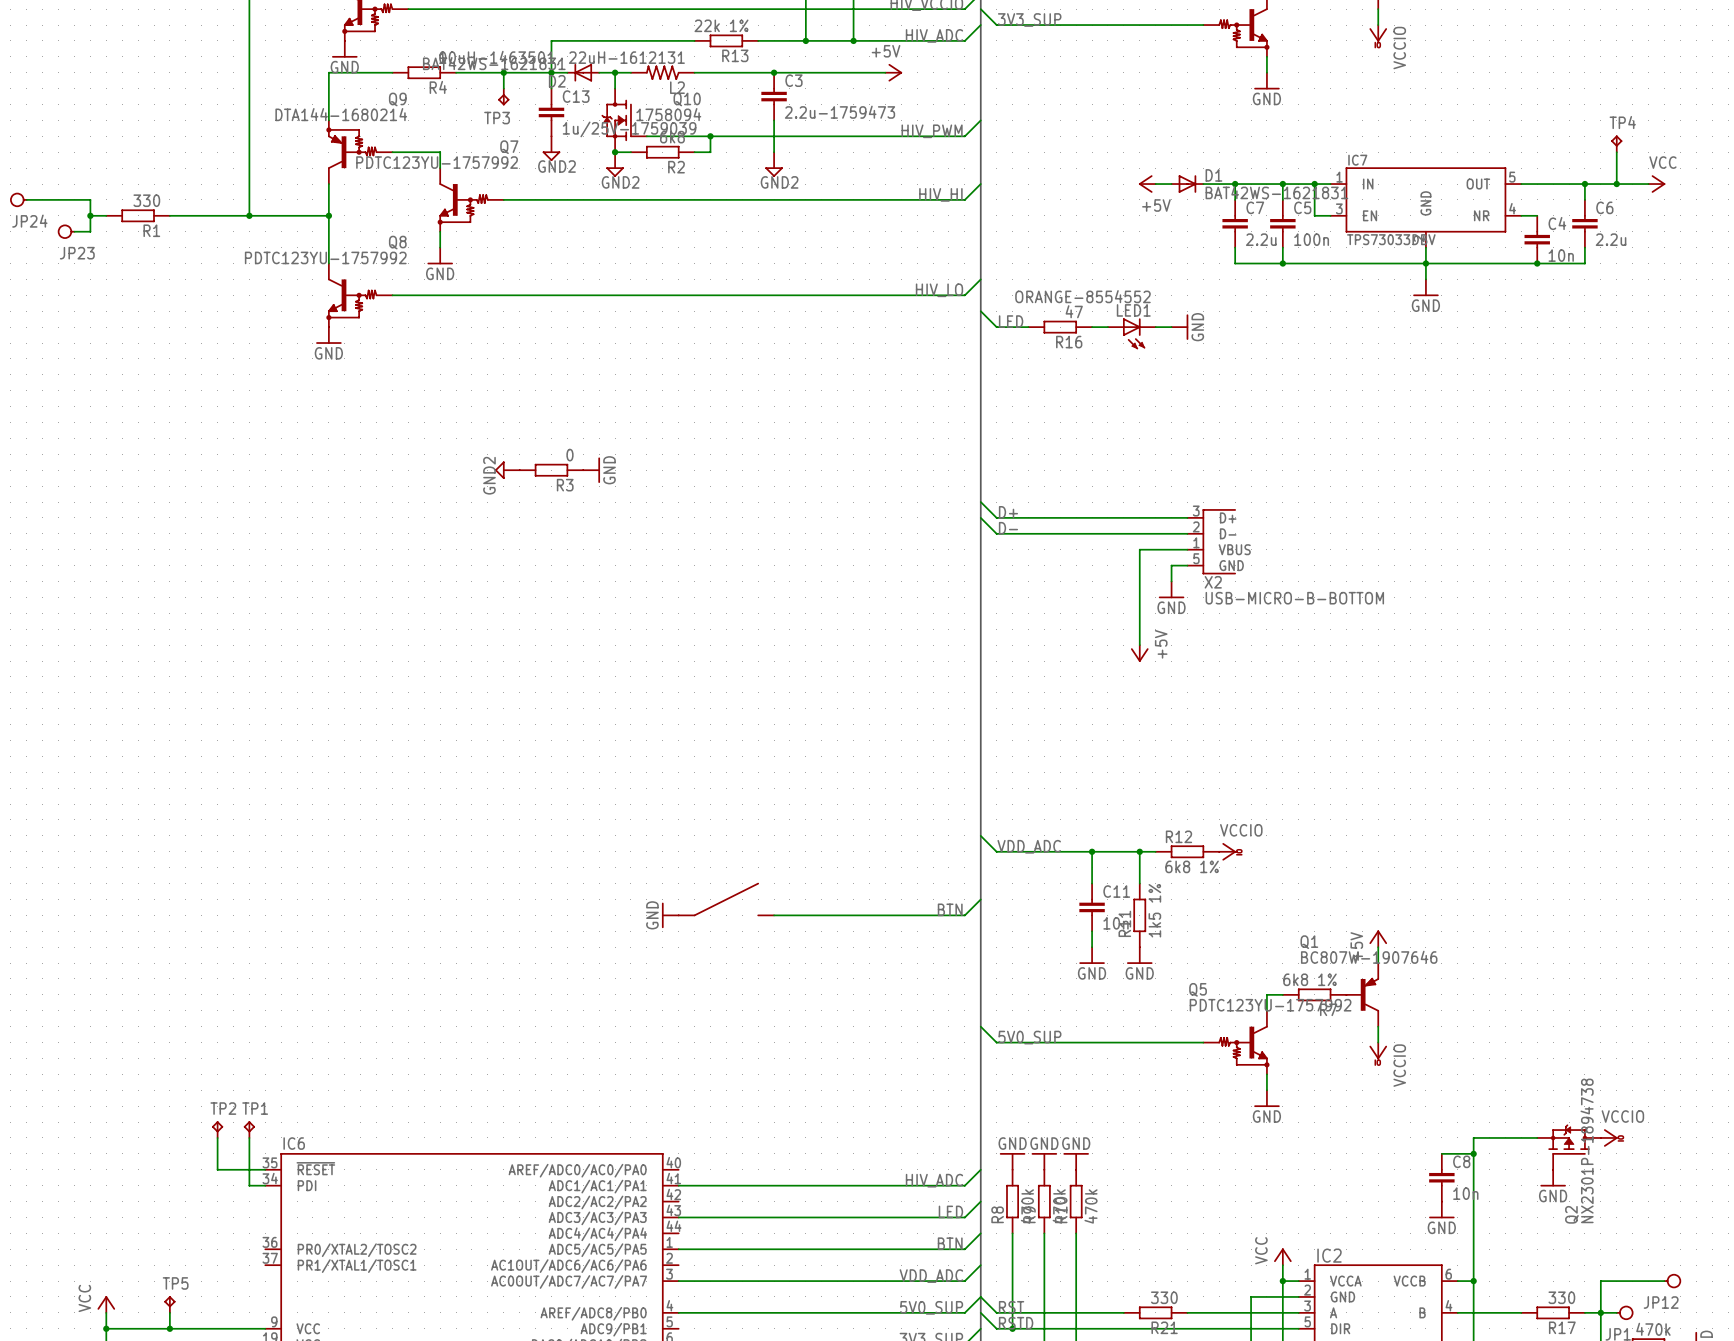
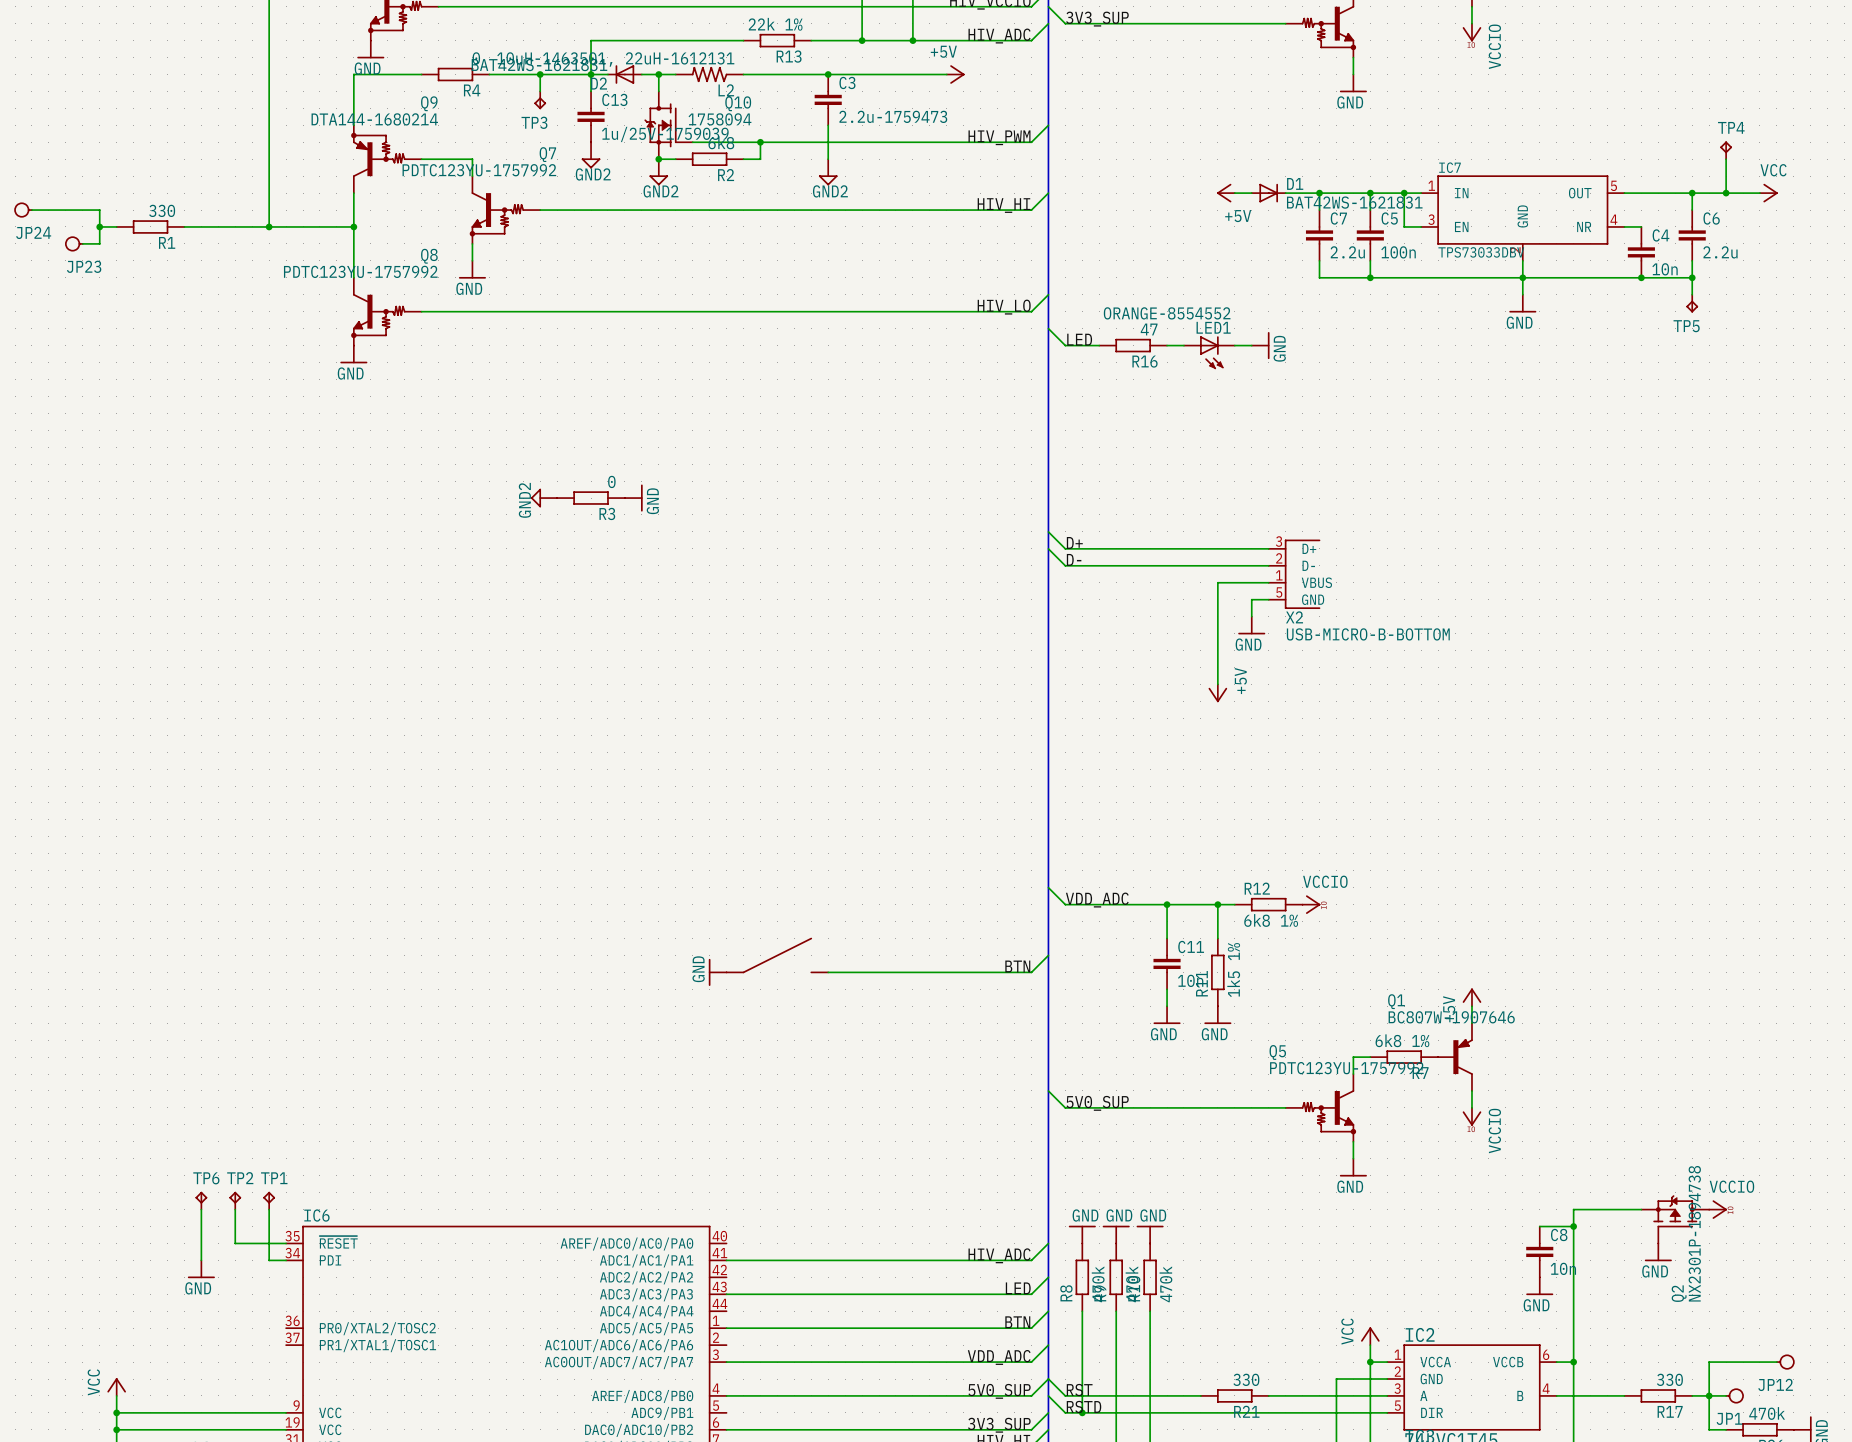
wire: none -> (1692, 277) (1692, 294)
junction: none -> (1692, 277)
TP6: none -> (201, 1200)
wire: none -> (201, 1209) (201, 1260)
power symbol: none -> GND (201, 1269)
TP5 rotation: 0° (169, 1301) -> 180° (1692, 306)
TP5 position: (169, 1304) -> (1692, 303)
wire: (169, 1312) (169, 1328) -> none
junction: (169, 1328) -> none

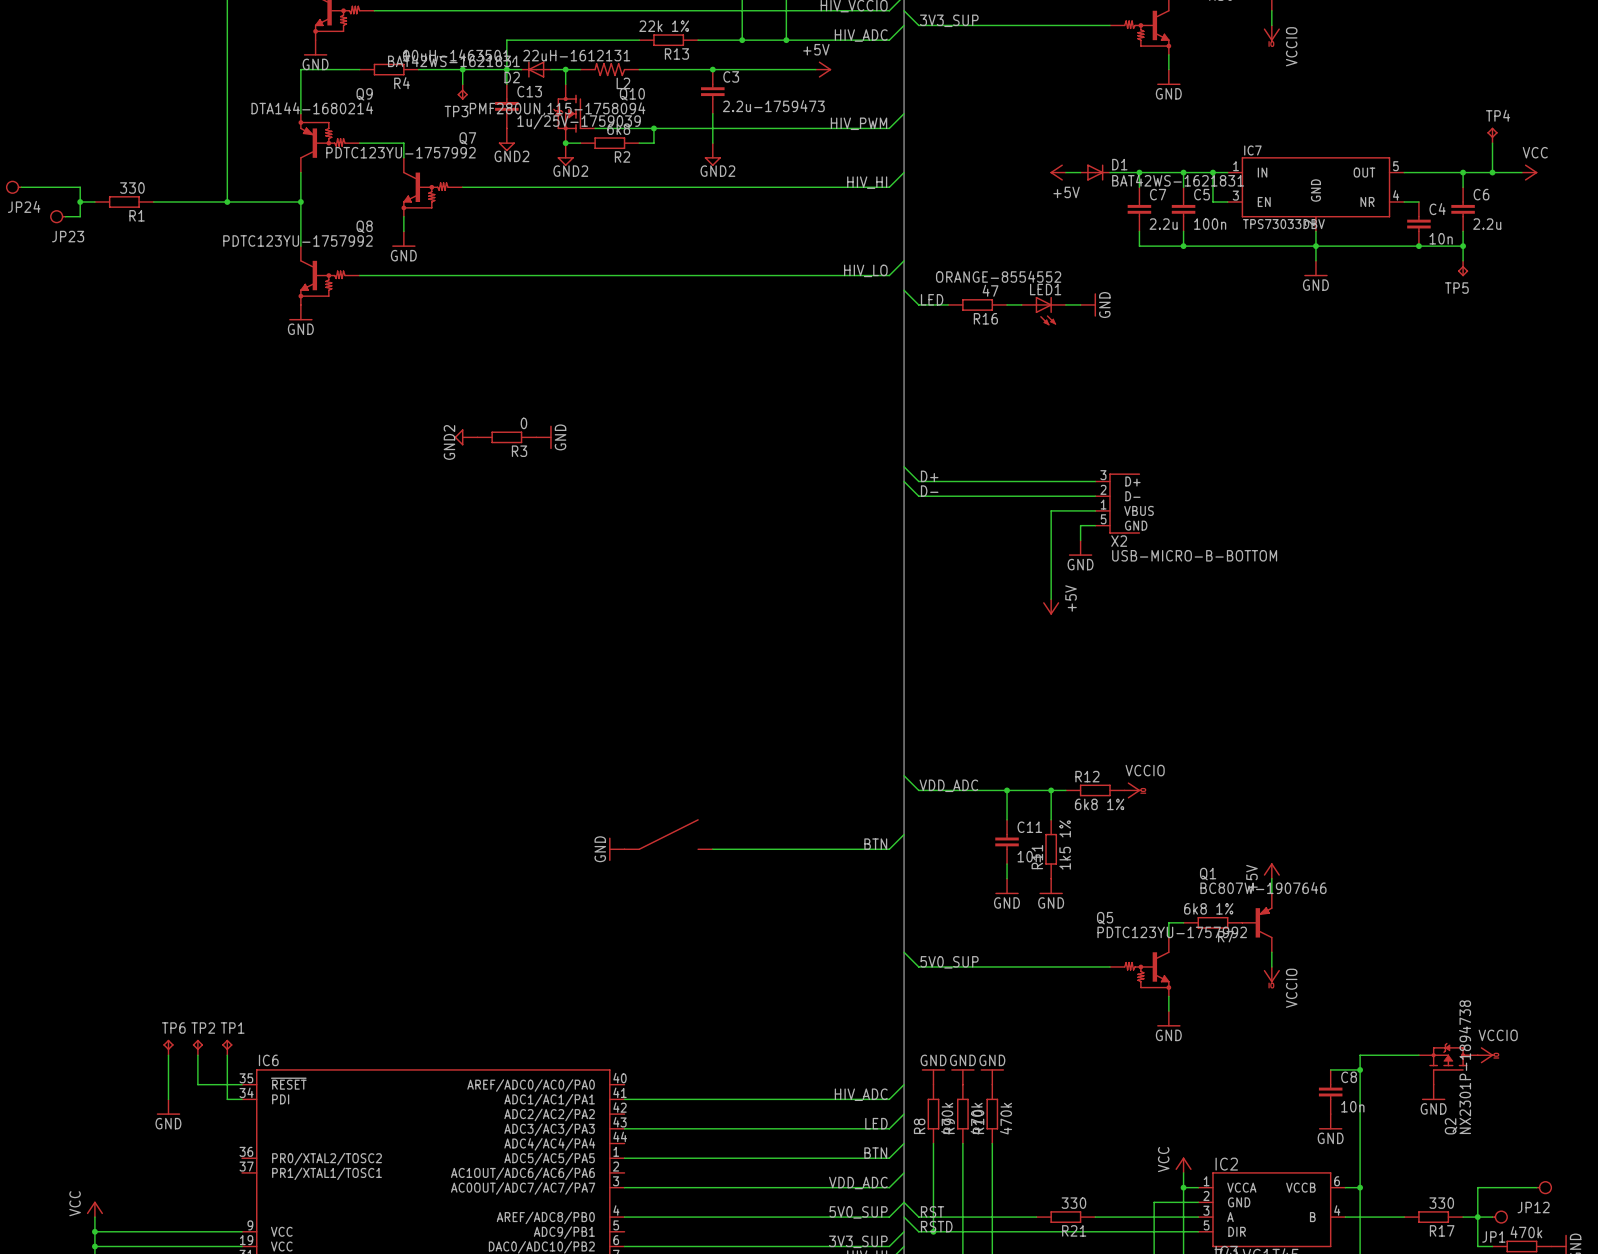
Q10 value: 1758094 (719, 119) -> PMF280UN,115-1758094 (557, 109)

